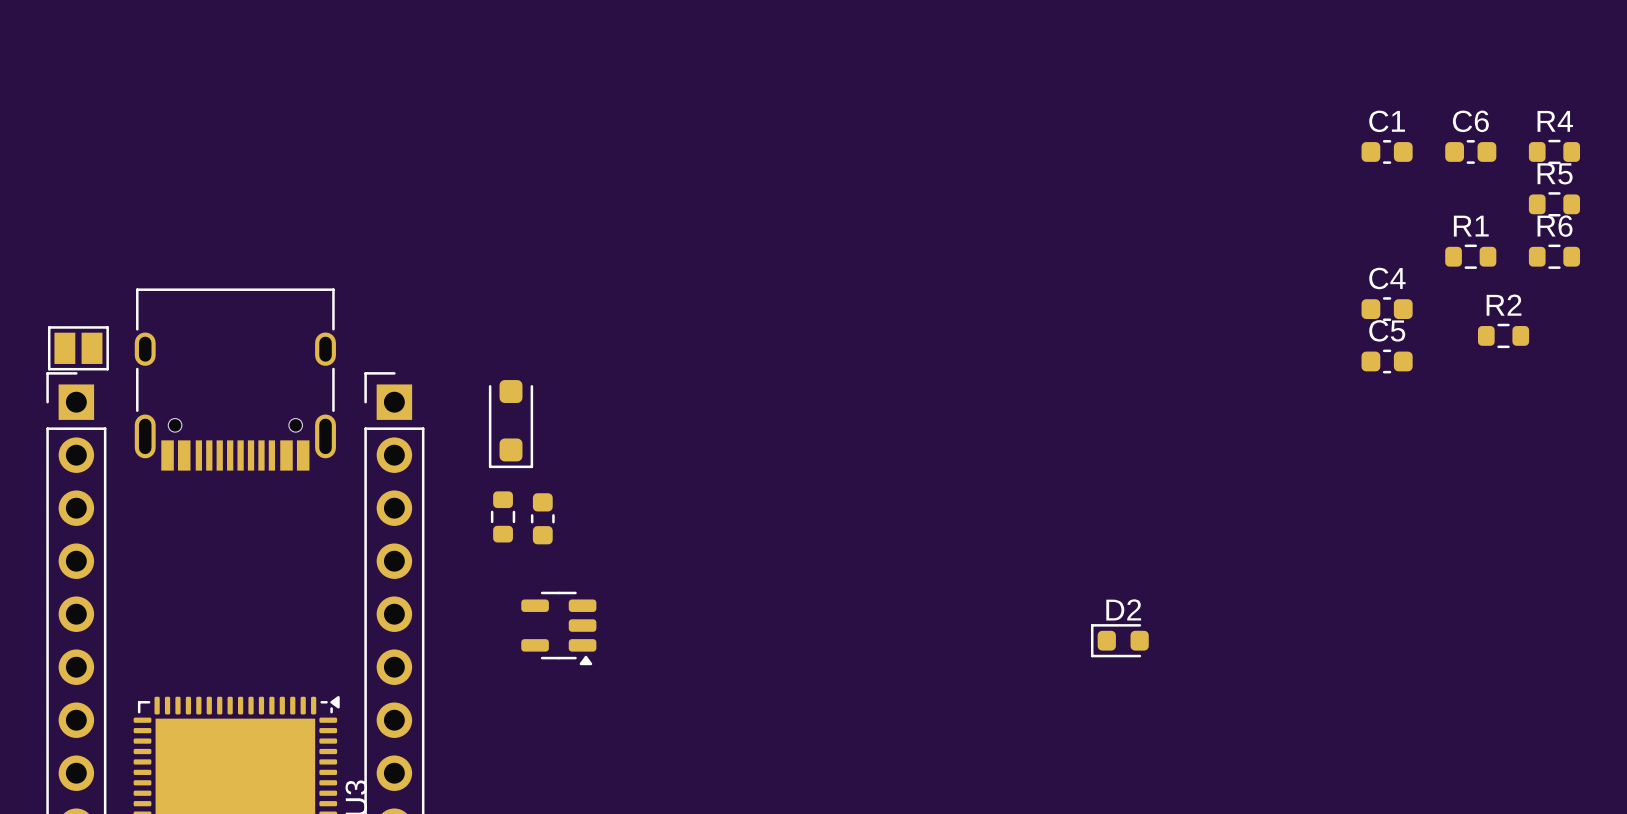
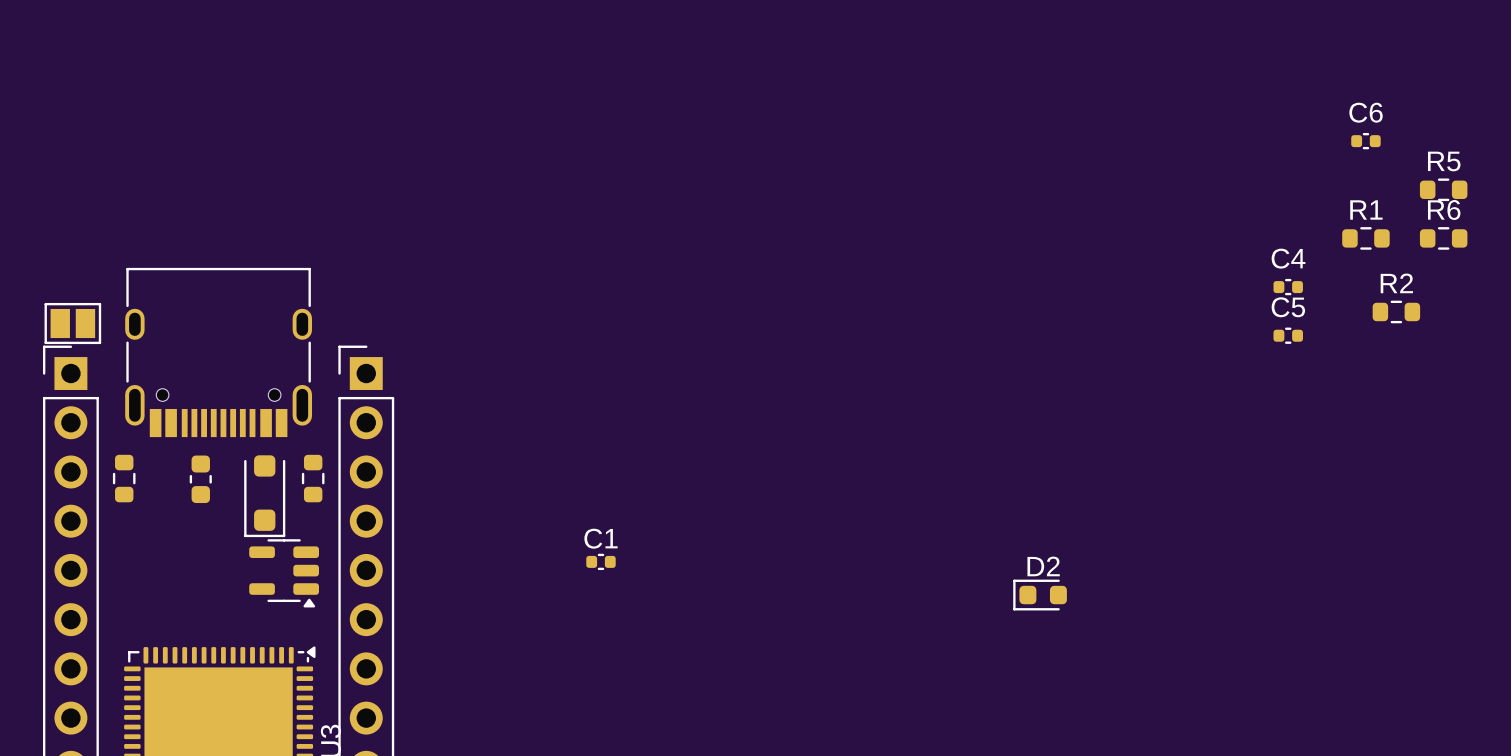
C1 footprint: [1361, 140, 1413, 164] -> [586, 553, 616, 571]
C6 footprint: [1445, 140, 1497, 164] -> [1351, 132, 1381, 150]
R4: (1554, 151) -> none
C4 footprint: [1361, 297, 1413, 322] -> [1273, 278, 1303, 296]
C5 footprint: [1361, 349, 1413, 374] -> [1273, 327, 1303, 344]
part position: (511, 424) -> (264, 496)
part: none -> (124, 478)
part position: (503, 516) -> (313, 478)
part position: (542, 518) -> (200, 479)
part position: (558, 628) -> (284, 573)

